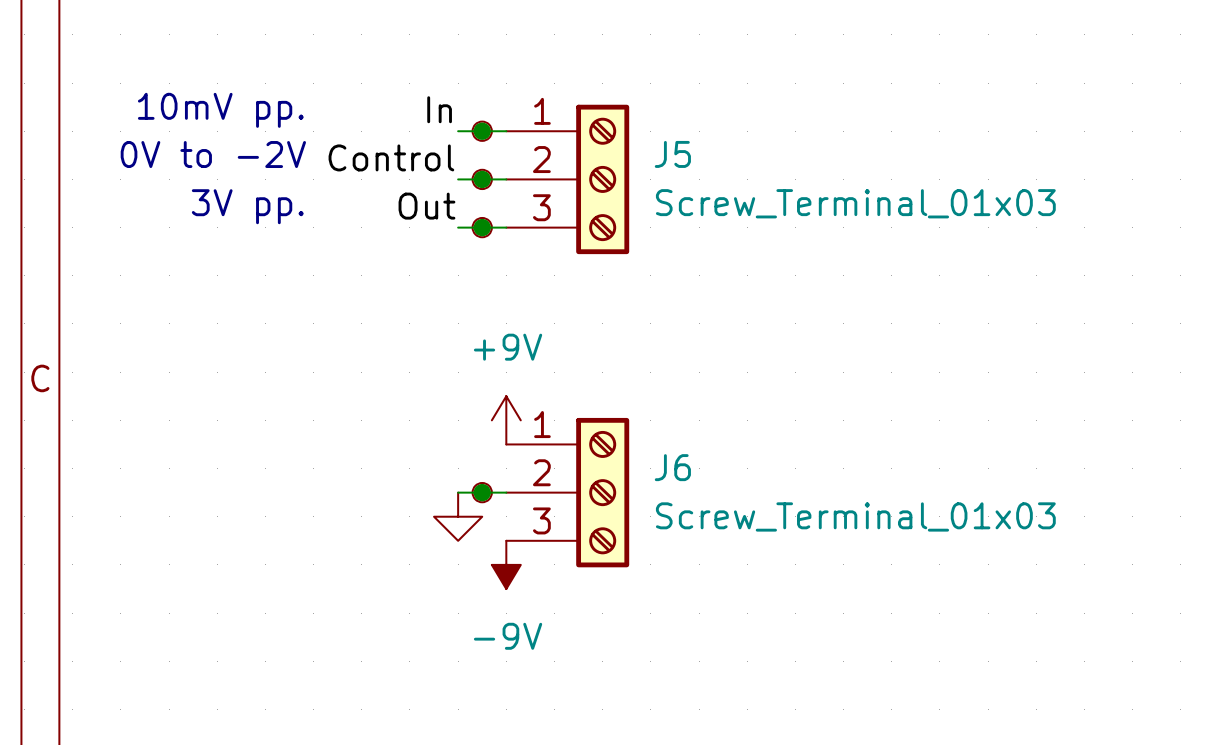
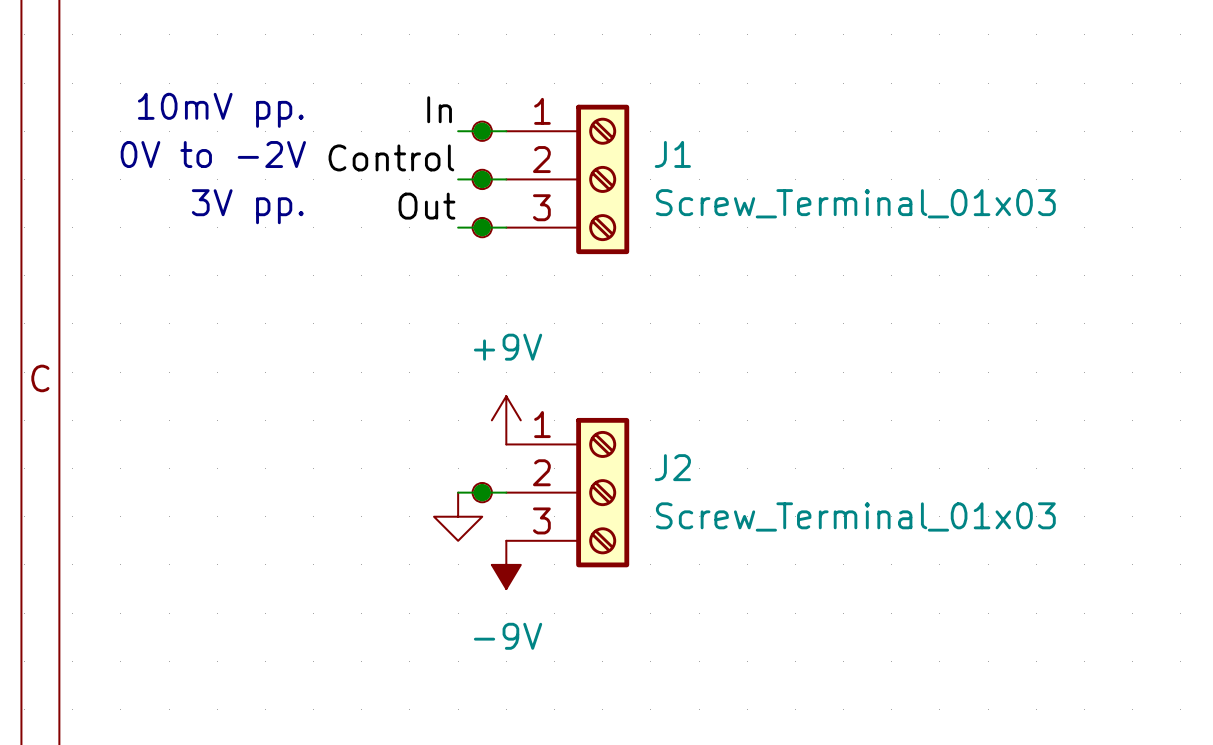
J5 name: J5 (672, 154) -> J1 (672, 154)
J6 name: J6 (672, 467) -> J2 (672, 467)

